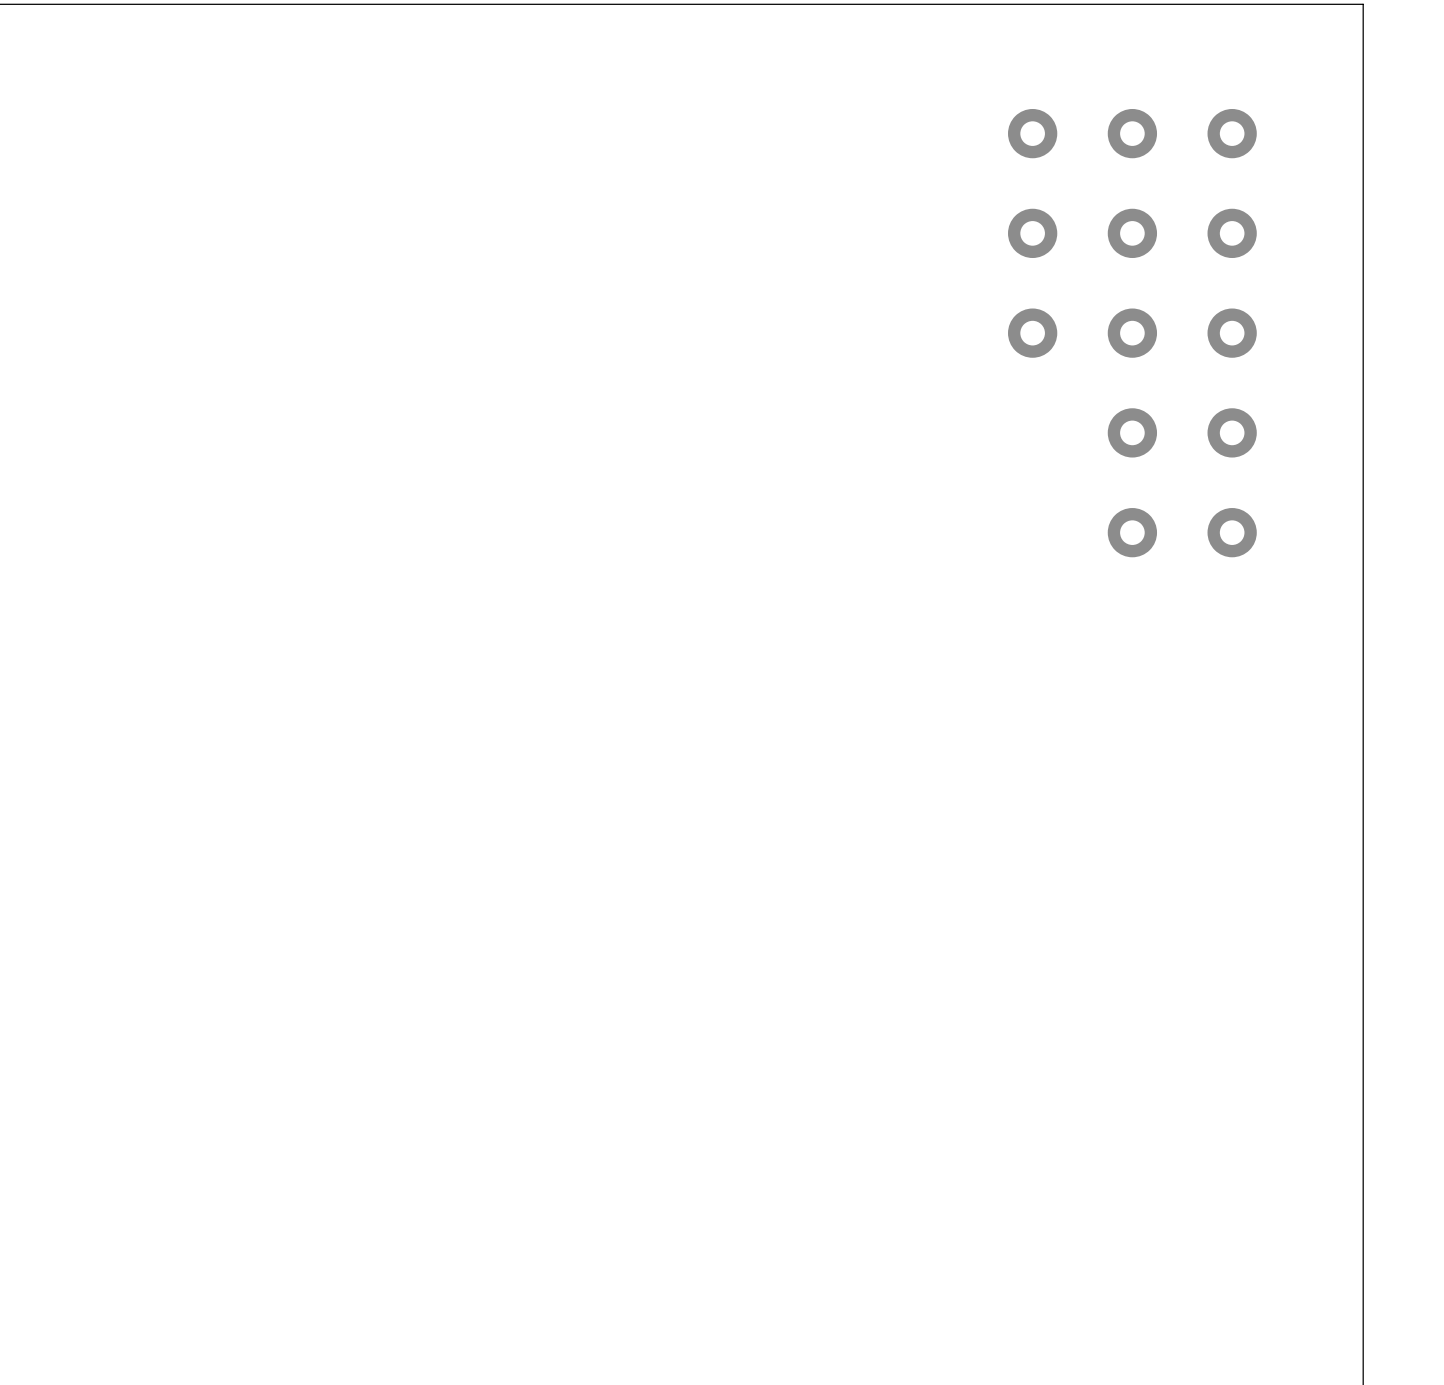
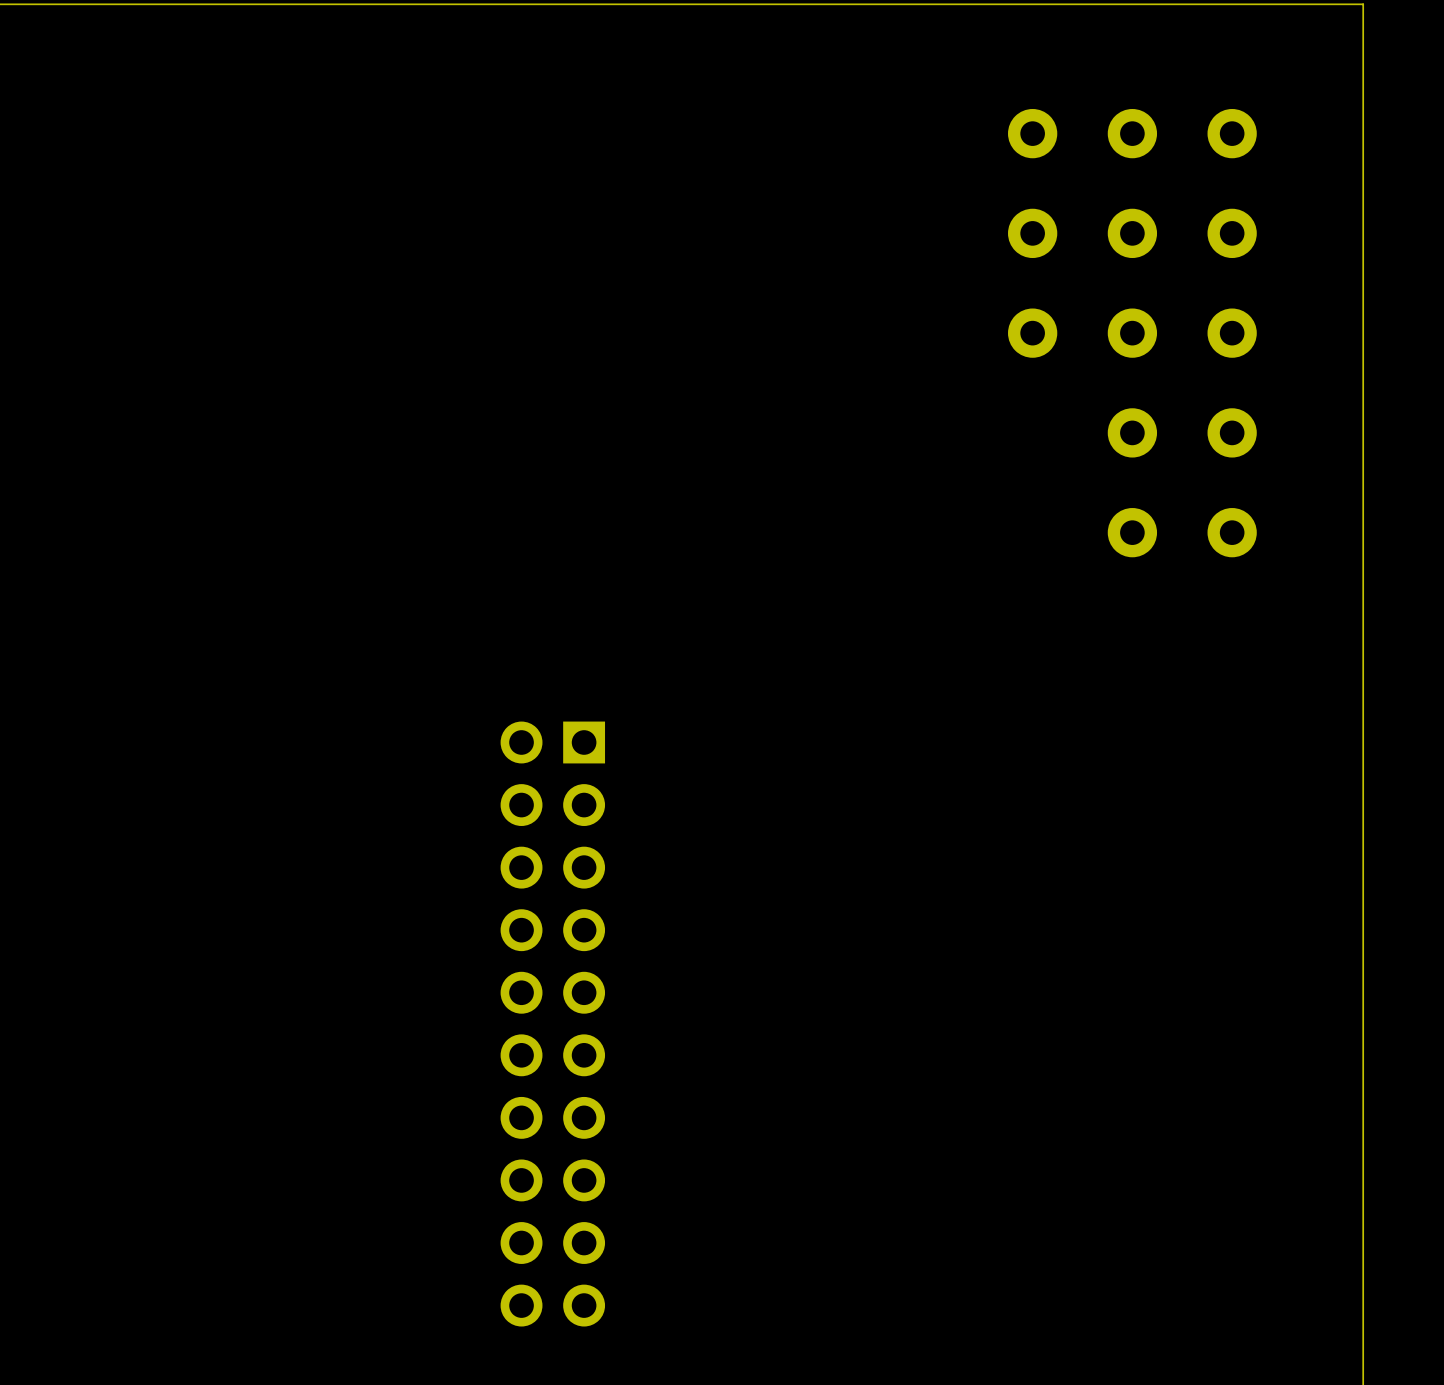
part: none -> (552, 1024)

